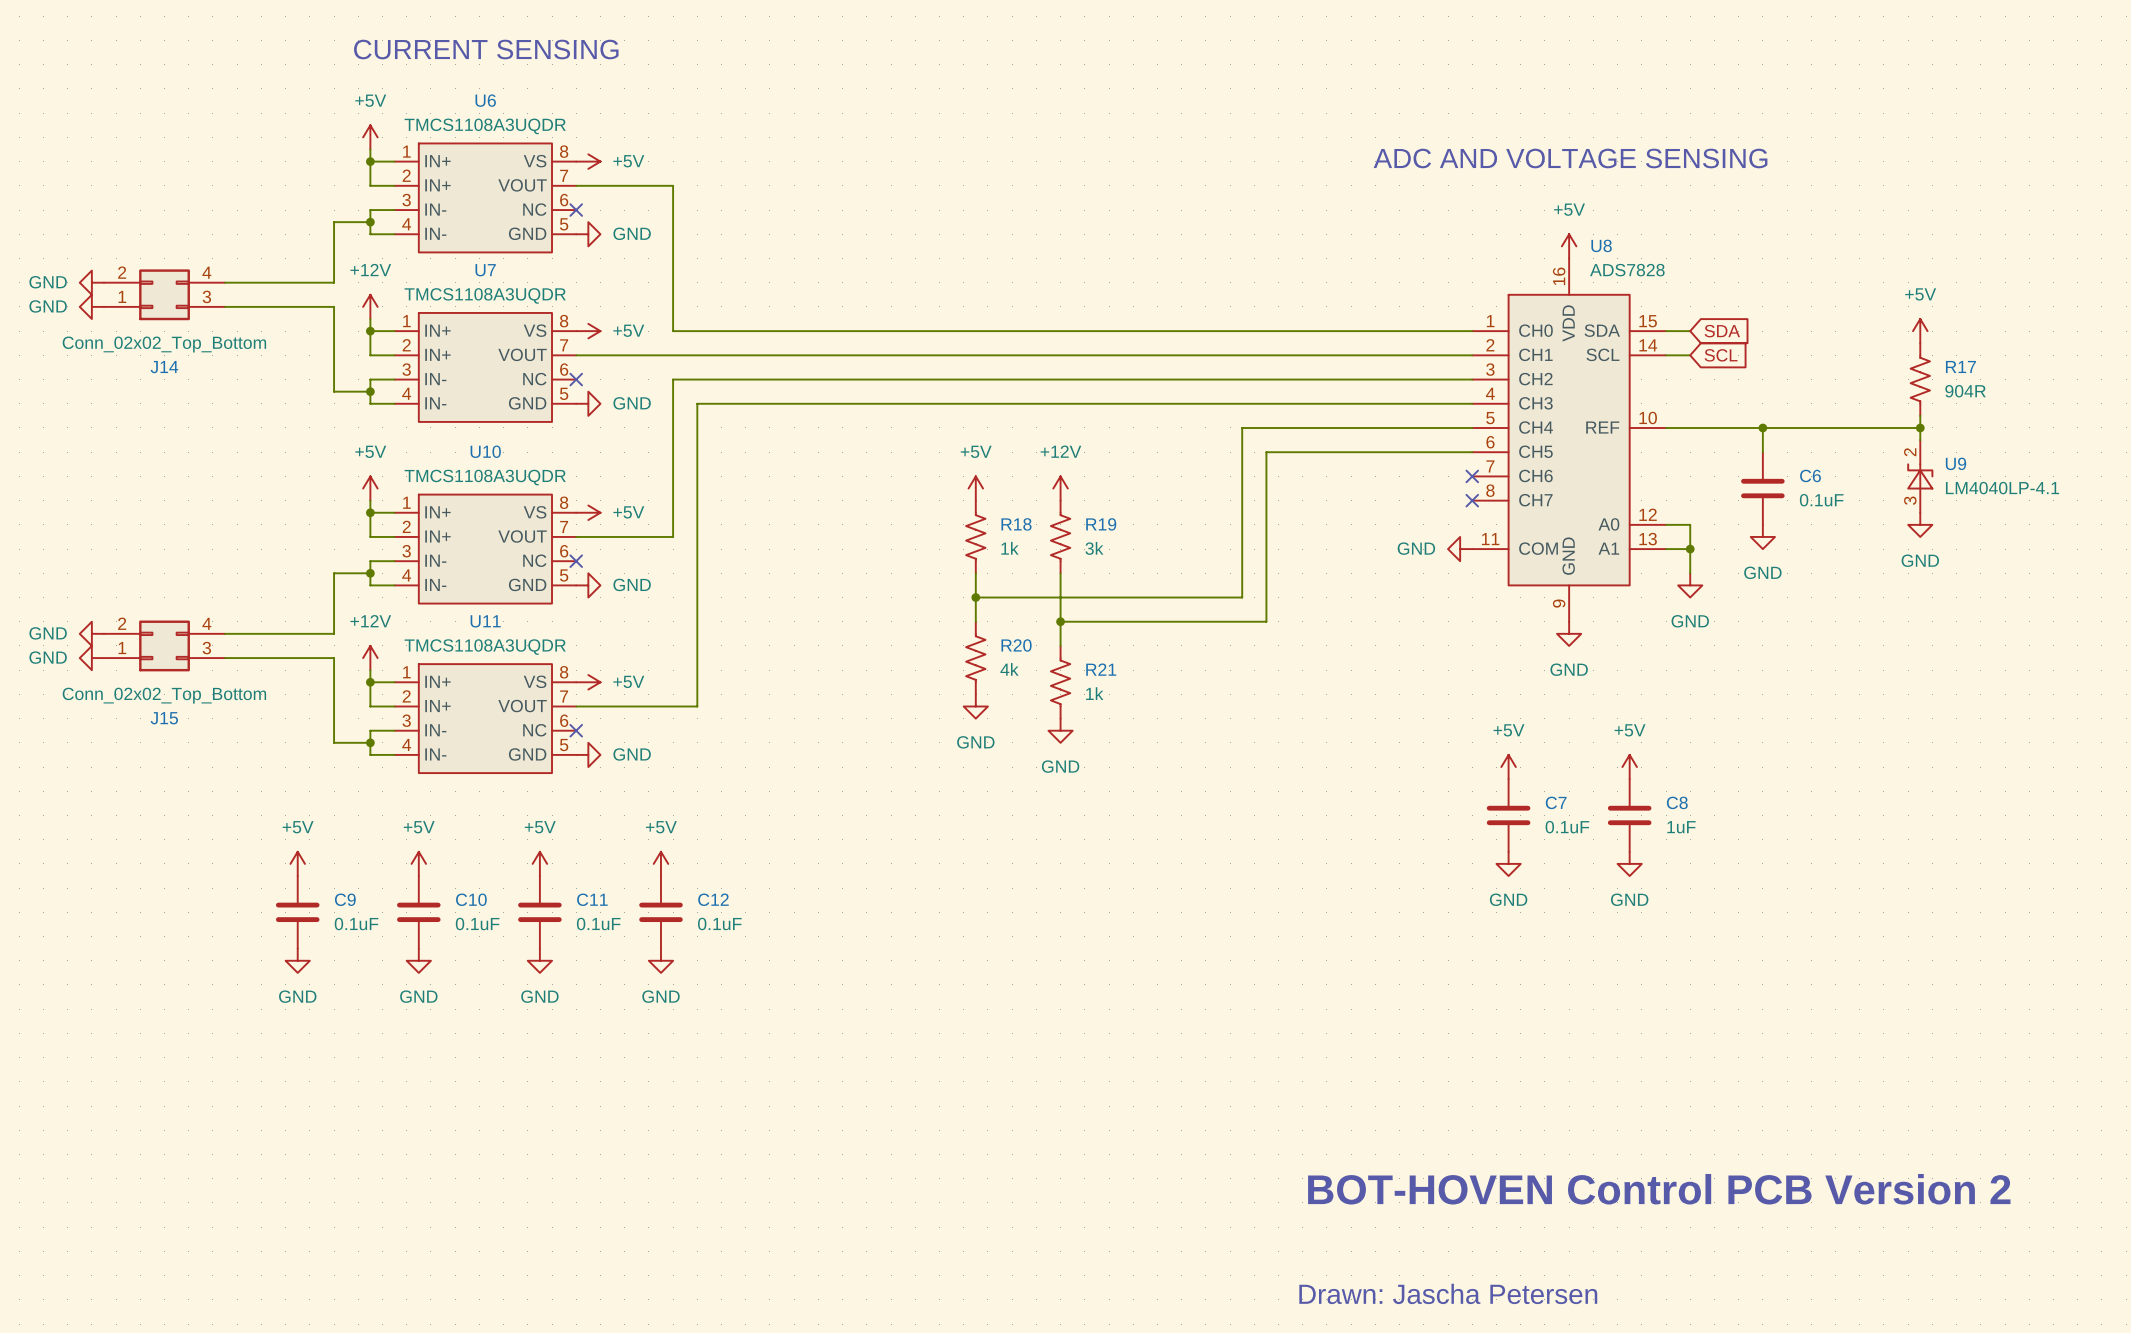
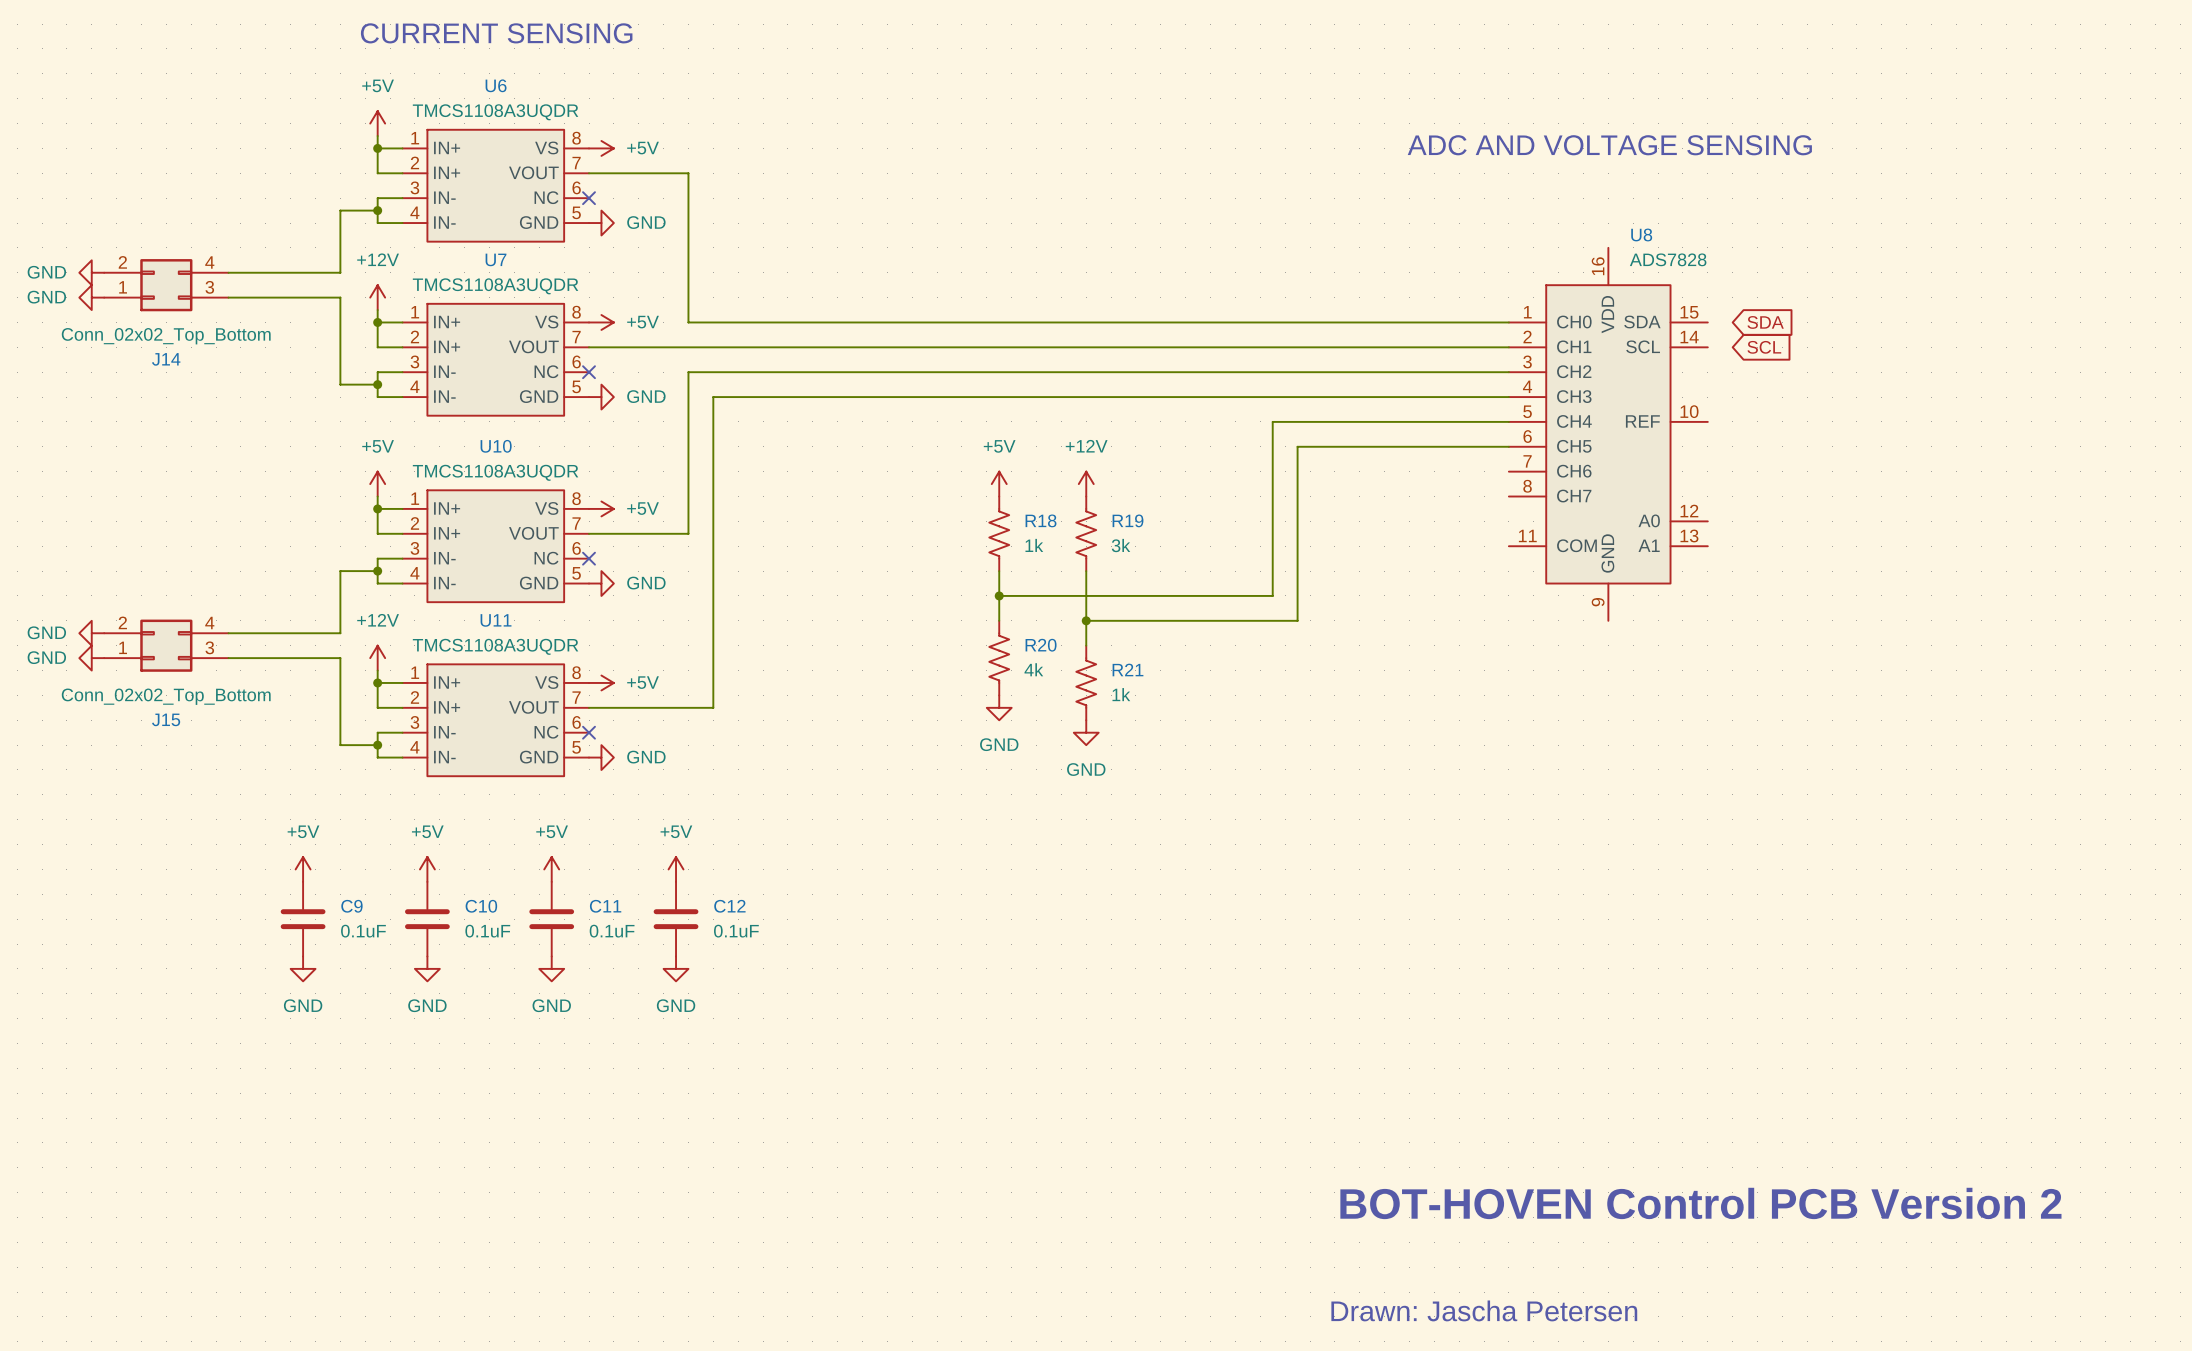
power symbol: +5V (1569, 246) -> none
wire: (1666, 331) (1690, 331) -> none
power symbol: +5V (1920, 331) -> none
wire: (1666, 355) (1690, 355) -> none
R17: 904R (1920, 379) -> none
wire: (1920, 415) (1920, 440) -> none
wire: (1666, 427) (1920, 427) -> none
wire: (1762, 427) (1762, 452) -> none
junction: (1762, 427) -> none
junction: (1920, 427) -> none
no-connect mark: (1472, 476) -> none
U9: LM4040LP-4.1 (1920, 476) -> none
C6: 0.1uF (1762, 488) -> none
no-connect mark: (1472, 500) -> none
wire: (1666, 524) (1690, 524) (1690, 573) -> none
power symbol: GND (1920, 524) -> none
power symbol: GND (1762, 536) -> none
power symbol: GND (1460, 549) -> none
wire: (1666, 549) (1690, 549) -> none
junction: (1690, 549) -> none
power symbol: GND (1690, 585) -> none
power symbol: GND (1569, 633) -> none
power symbol: +5V (1508, 767) -> none
power symbol: +5V (1629, 767) -> none
C7: 0.1uF (1508, 815) -> none
C8: 1uF (1629, 815) -> none
power symbol: GND (1508, 863) -> none
power symbol: GND (1629, 863) -> none

